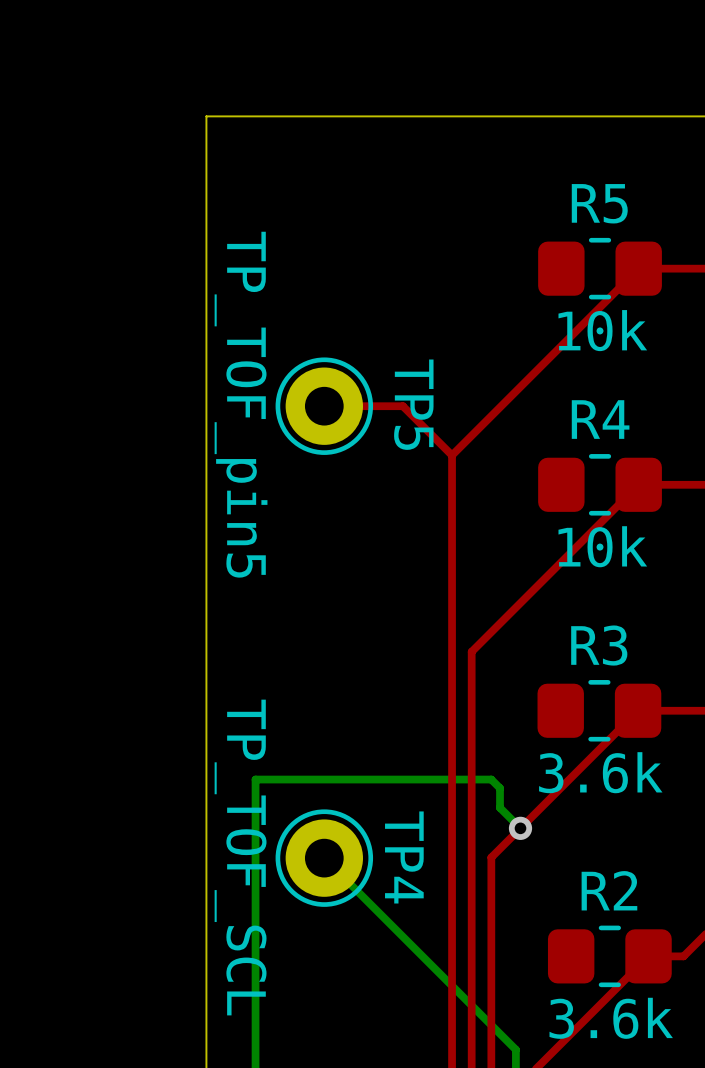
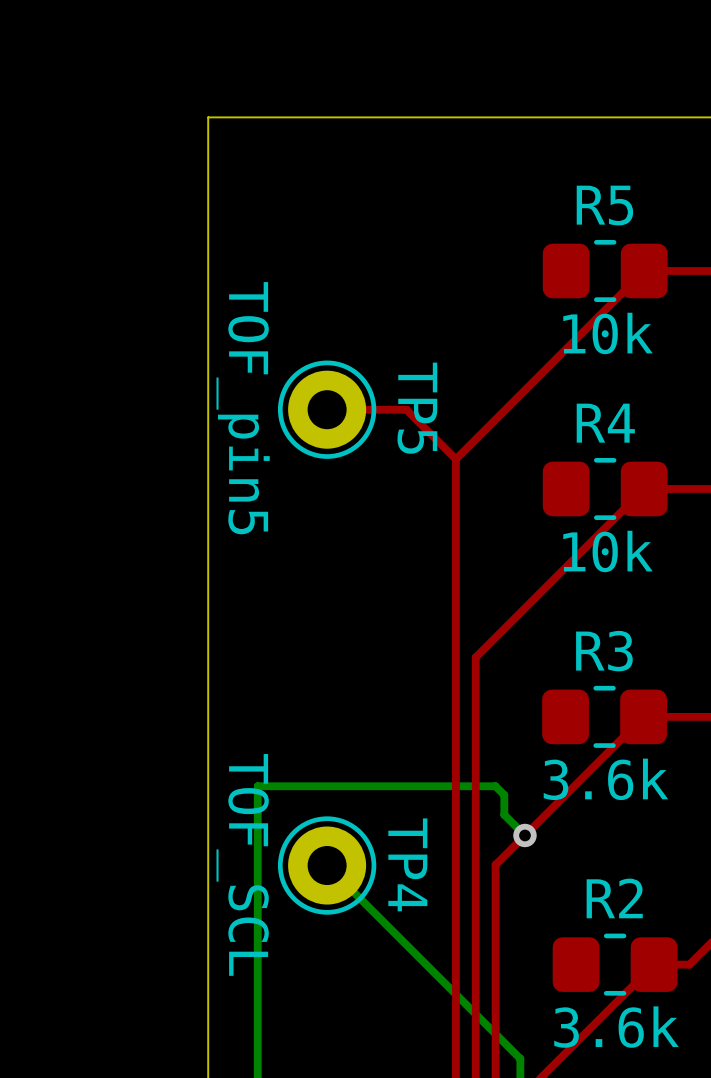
TP5 value: TP_TOF_pin5 (241, 404) -> TOF_pin5 (243, 408)
TP4 value: TP_TOF_SCL (240, 857) -> TOF_SCL (242, 864)

